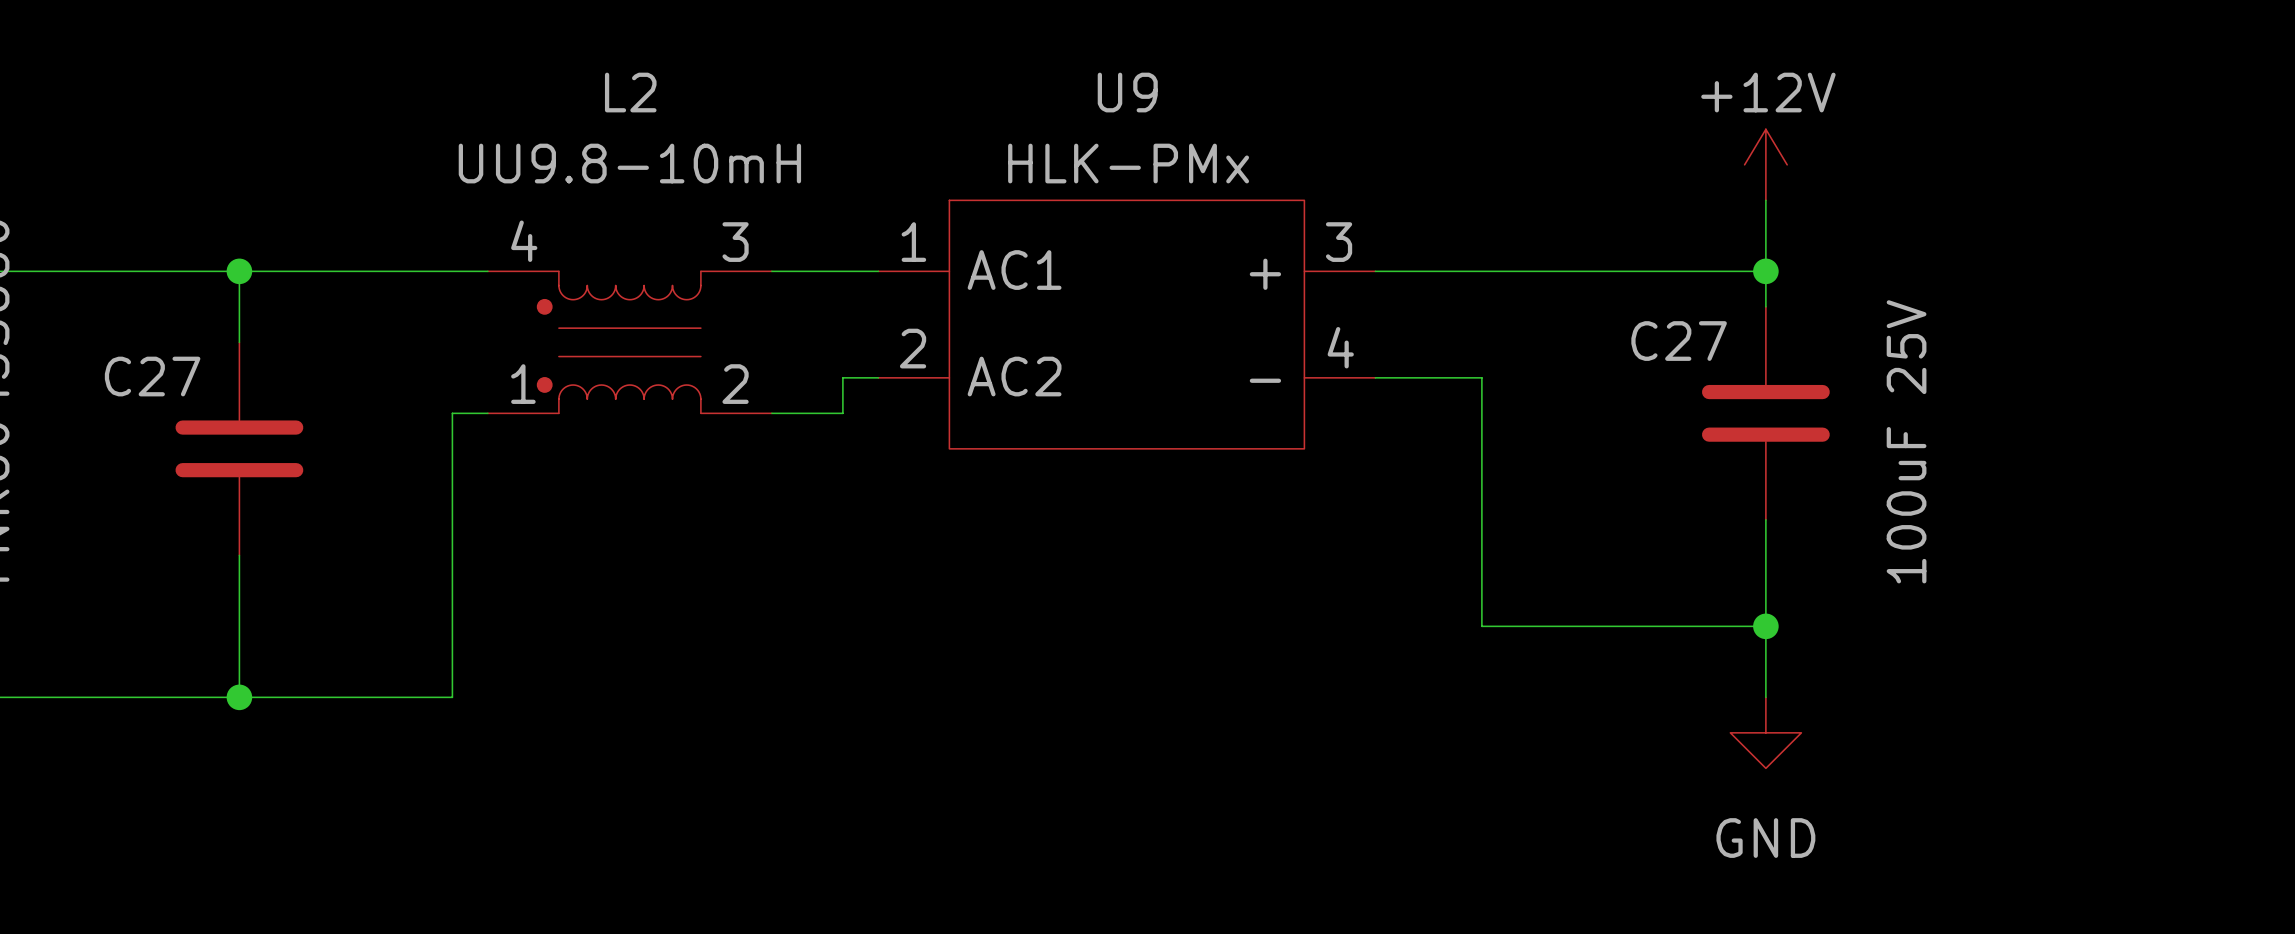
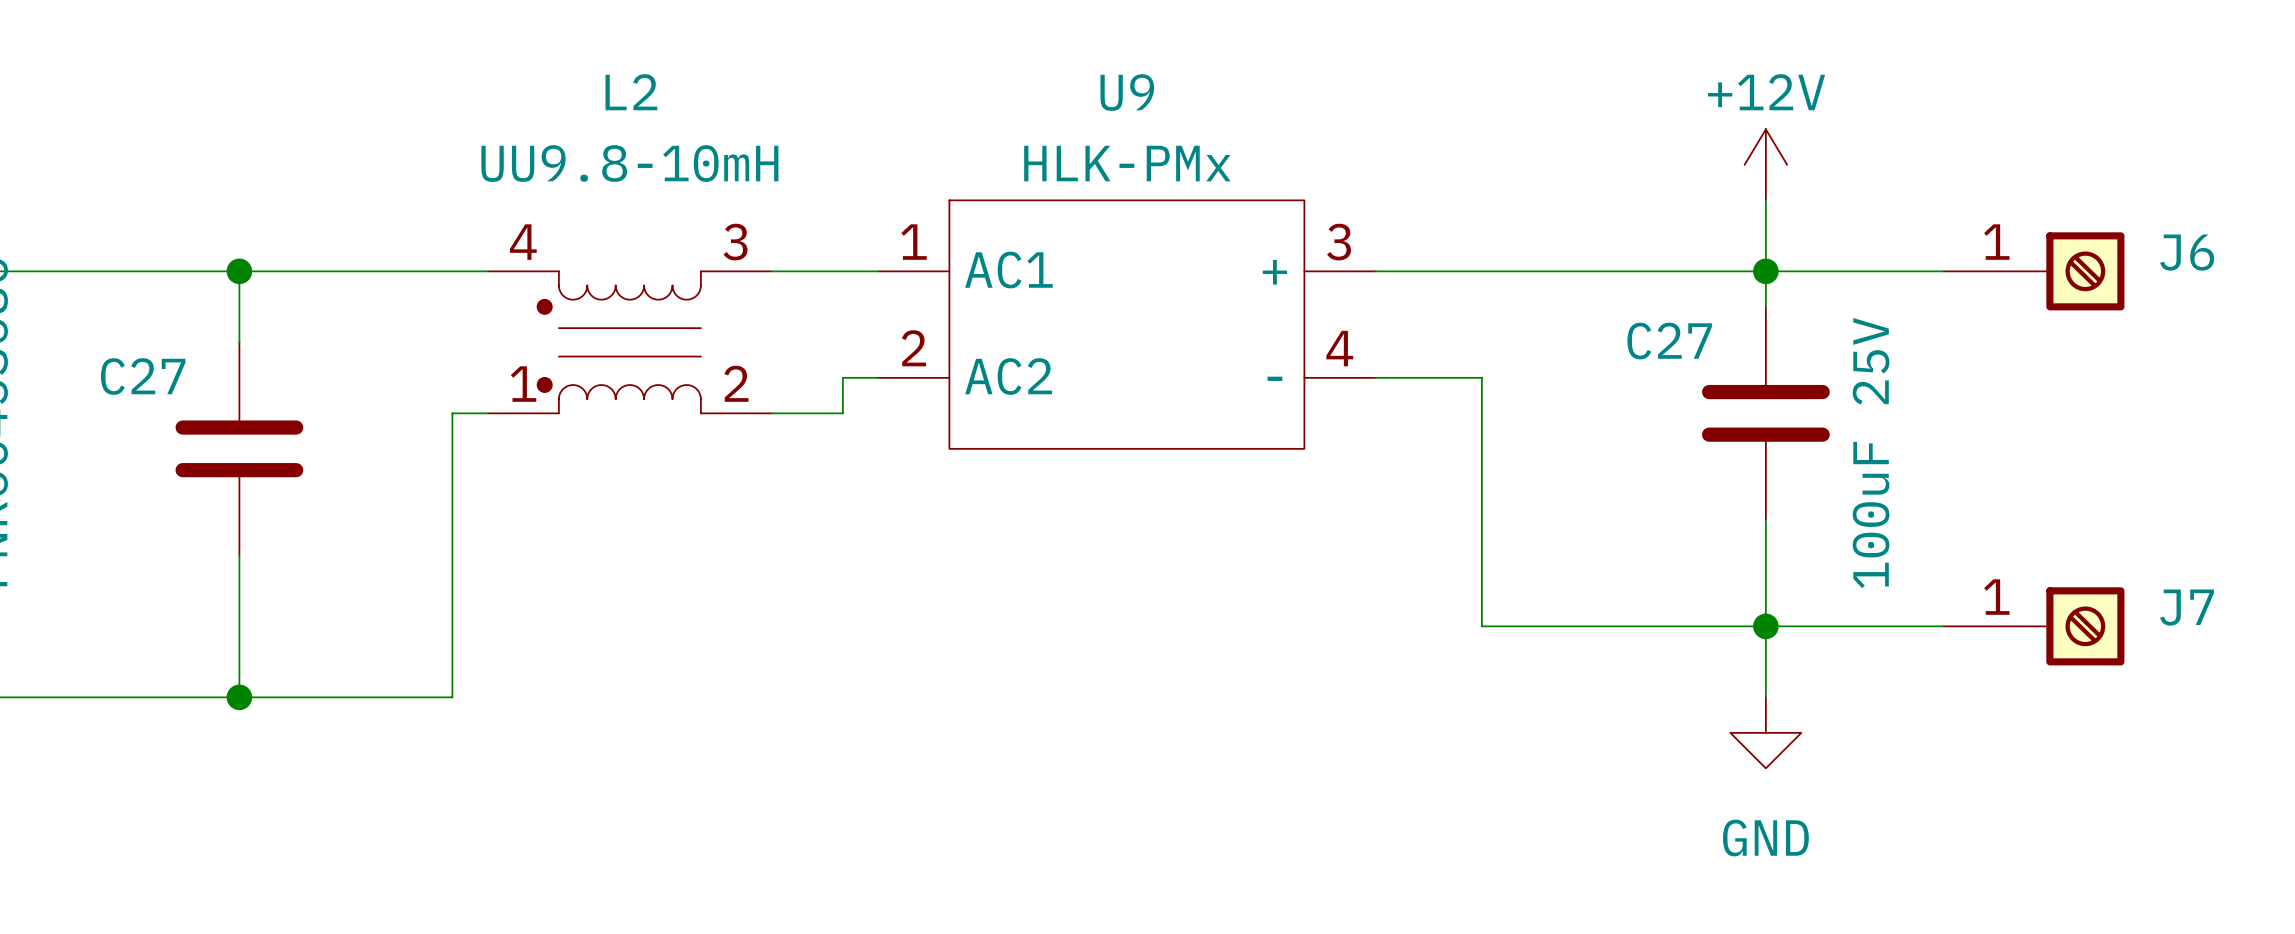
wire: none -> (1765, 271) (1943, 271)
J6: none -> (2033, 271)
C27 value position: 100uF 25V (1906, 441) -> 100uF 25V (1871, 453)
wire: none -> (1765, 626) (1943, 626)
J7: none -> (2033, 626)

